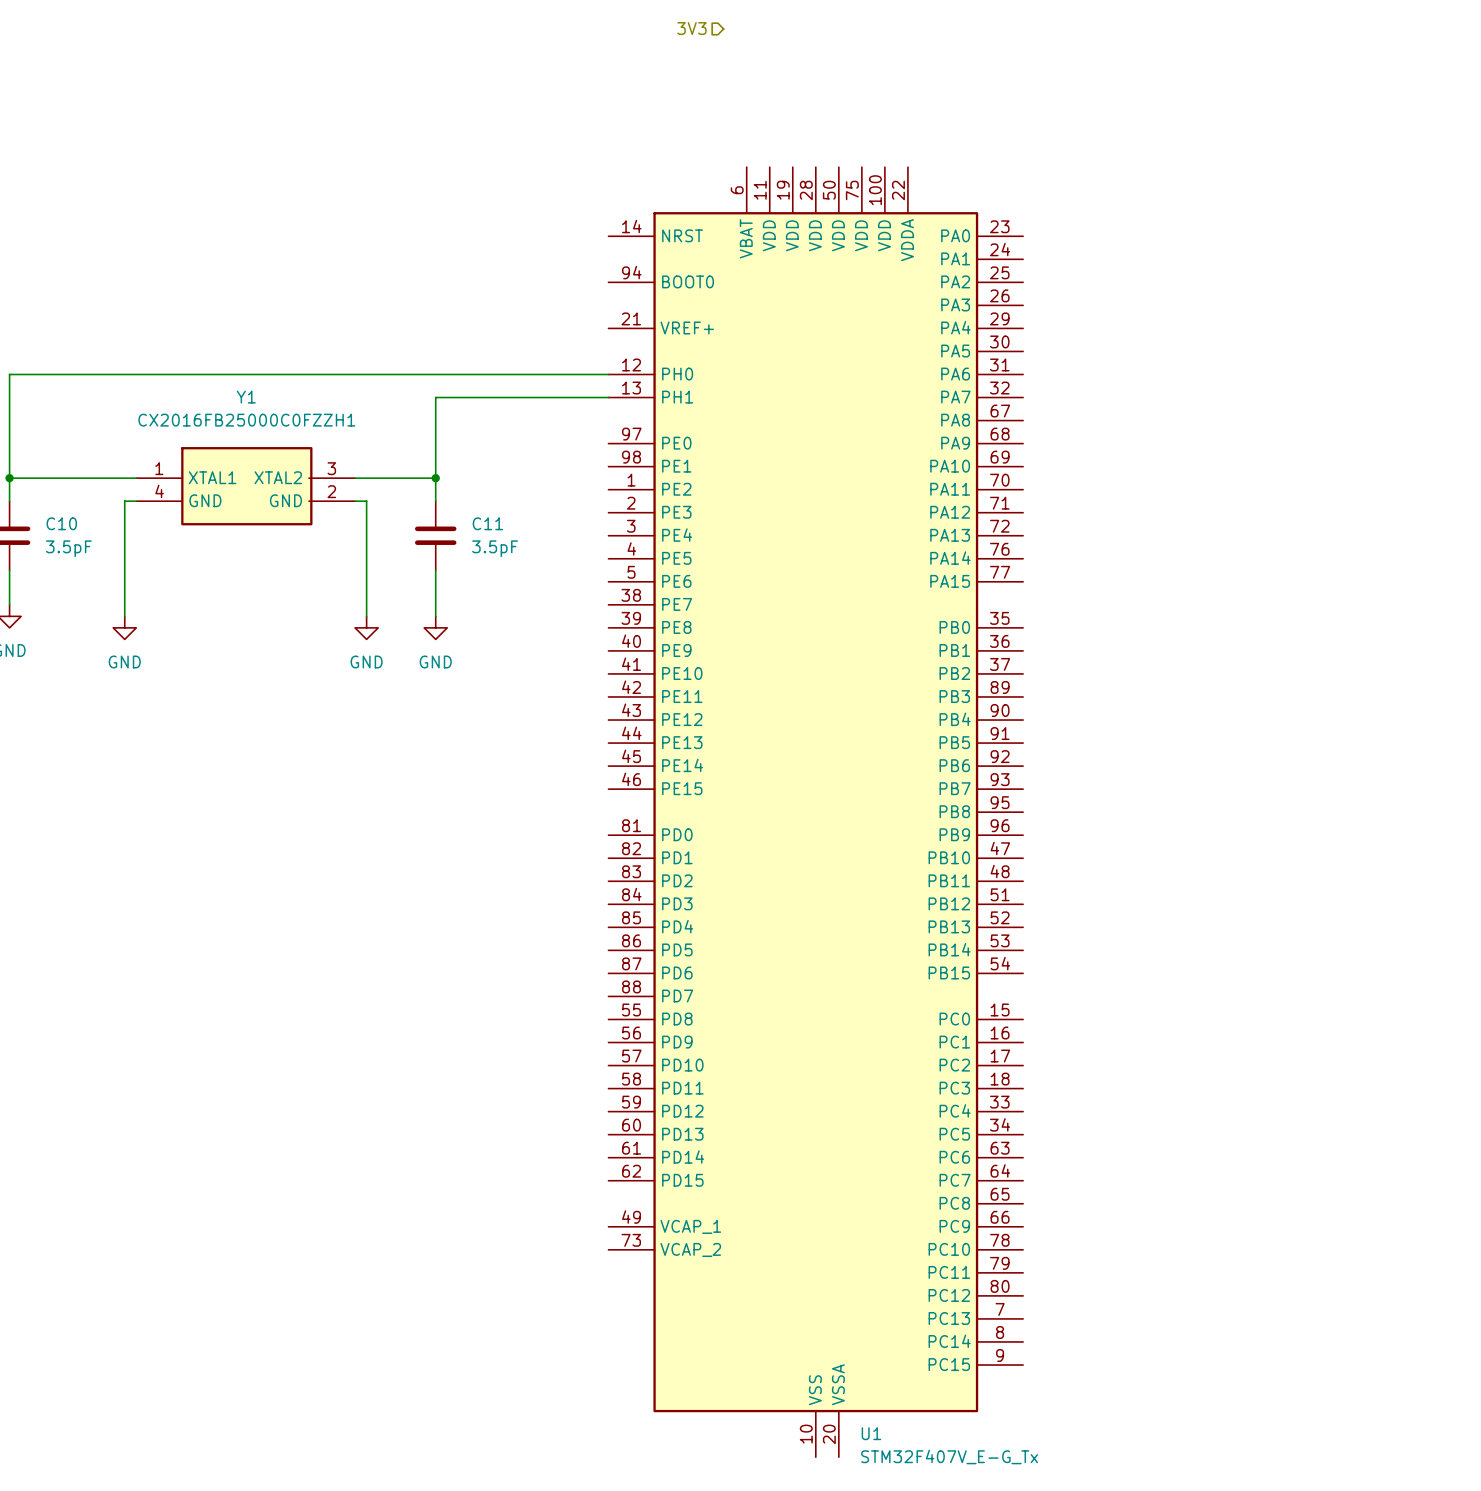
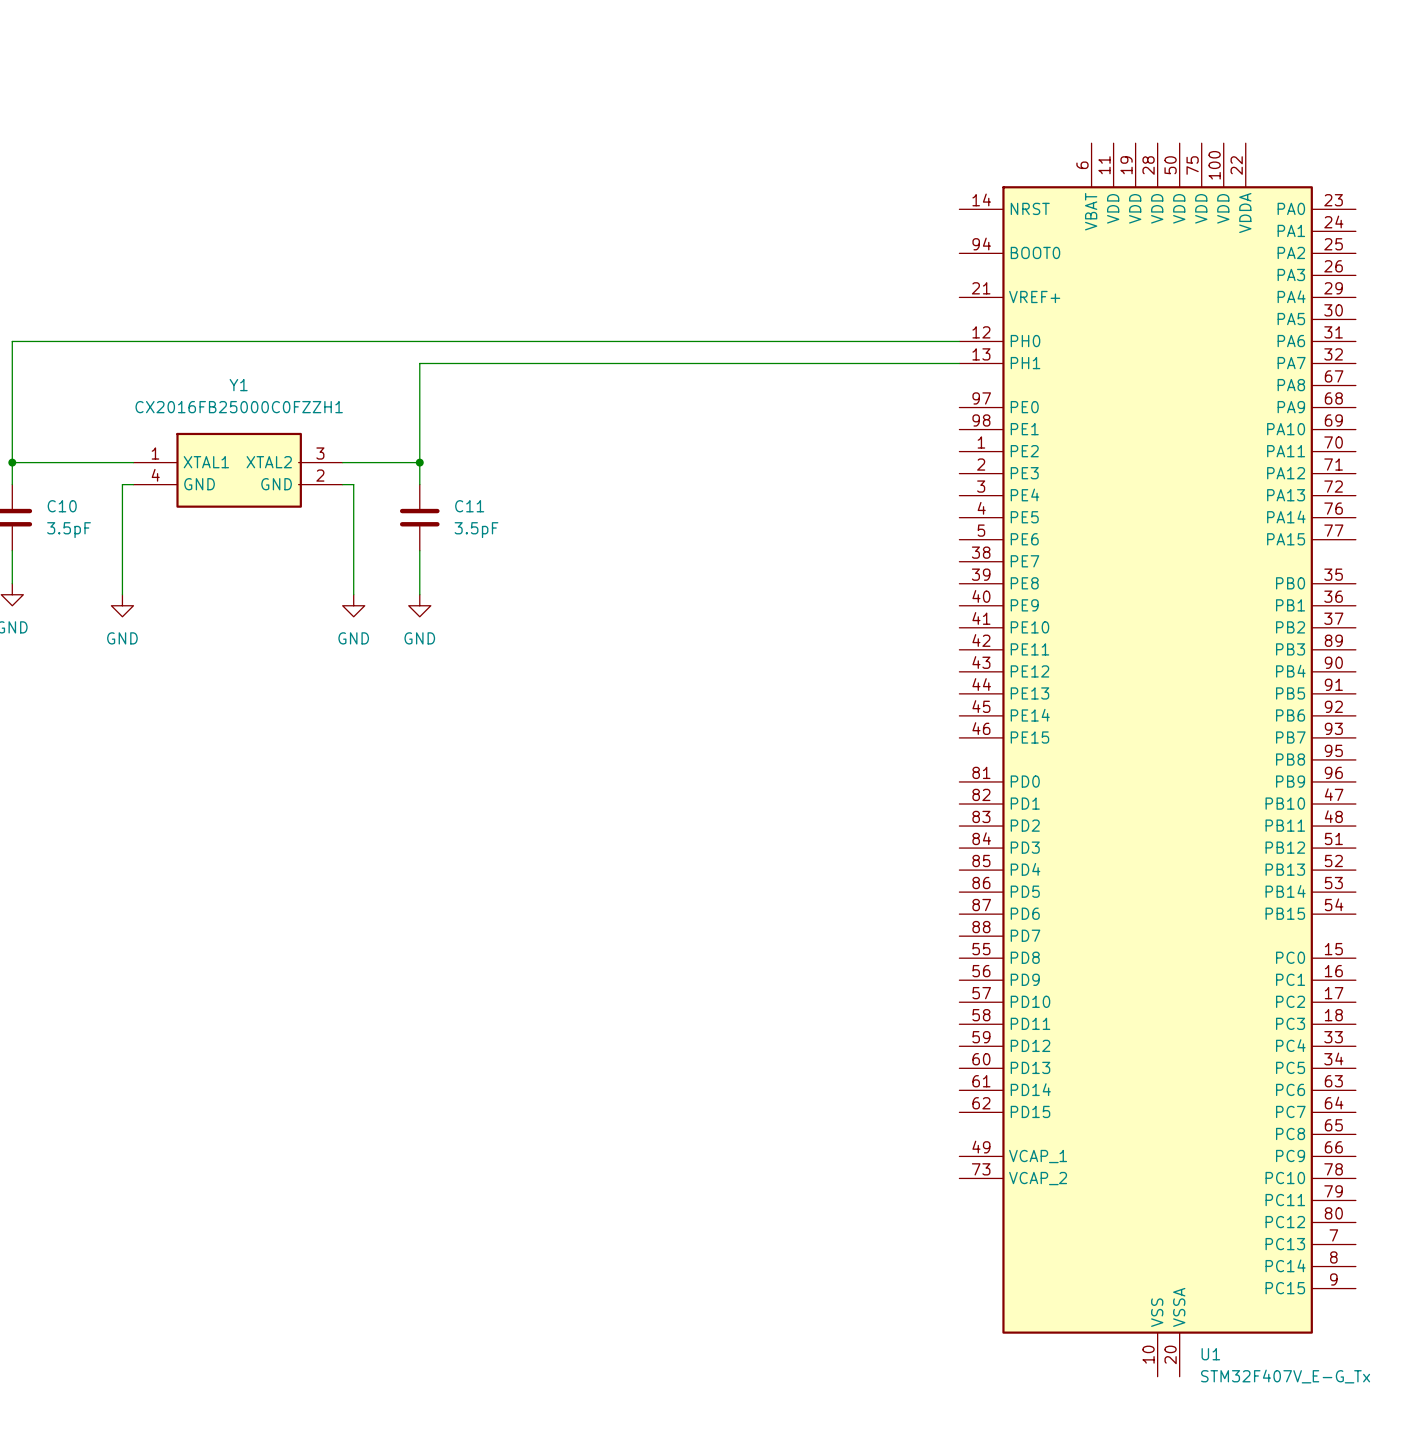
hierarchical label: 3V3 (691, 28) -> none
wire: (9, 374) (435, 374) -> (12, 363) (12, 341) (959, 341)
wire: (435, 397) (608, 397) -> (419, 385) (419, 363)
U1 position: (815, 812) -> (1157, 759)

